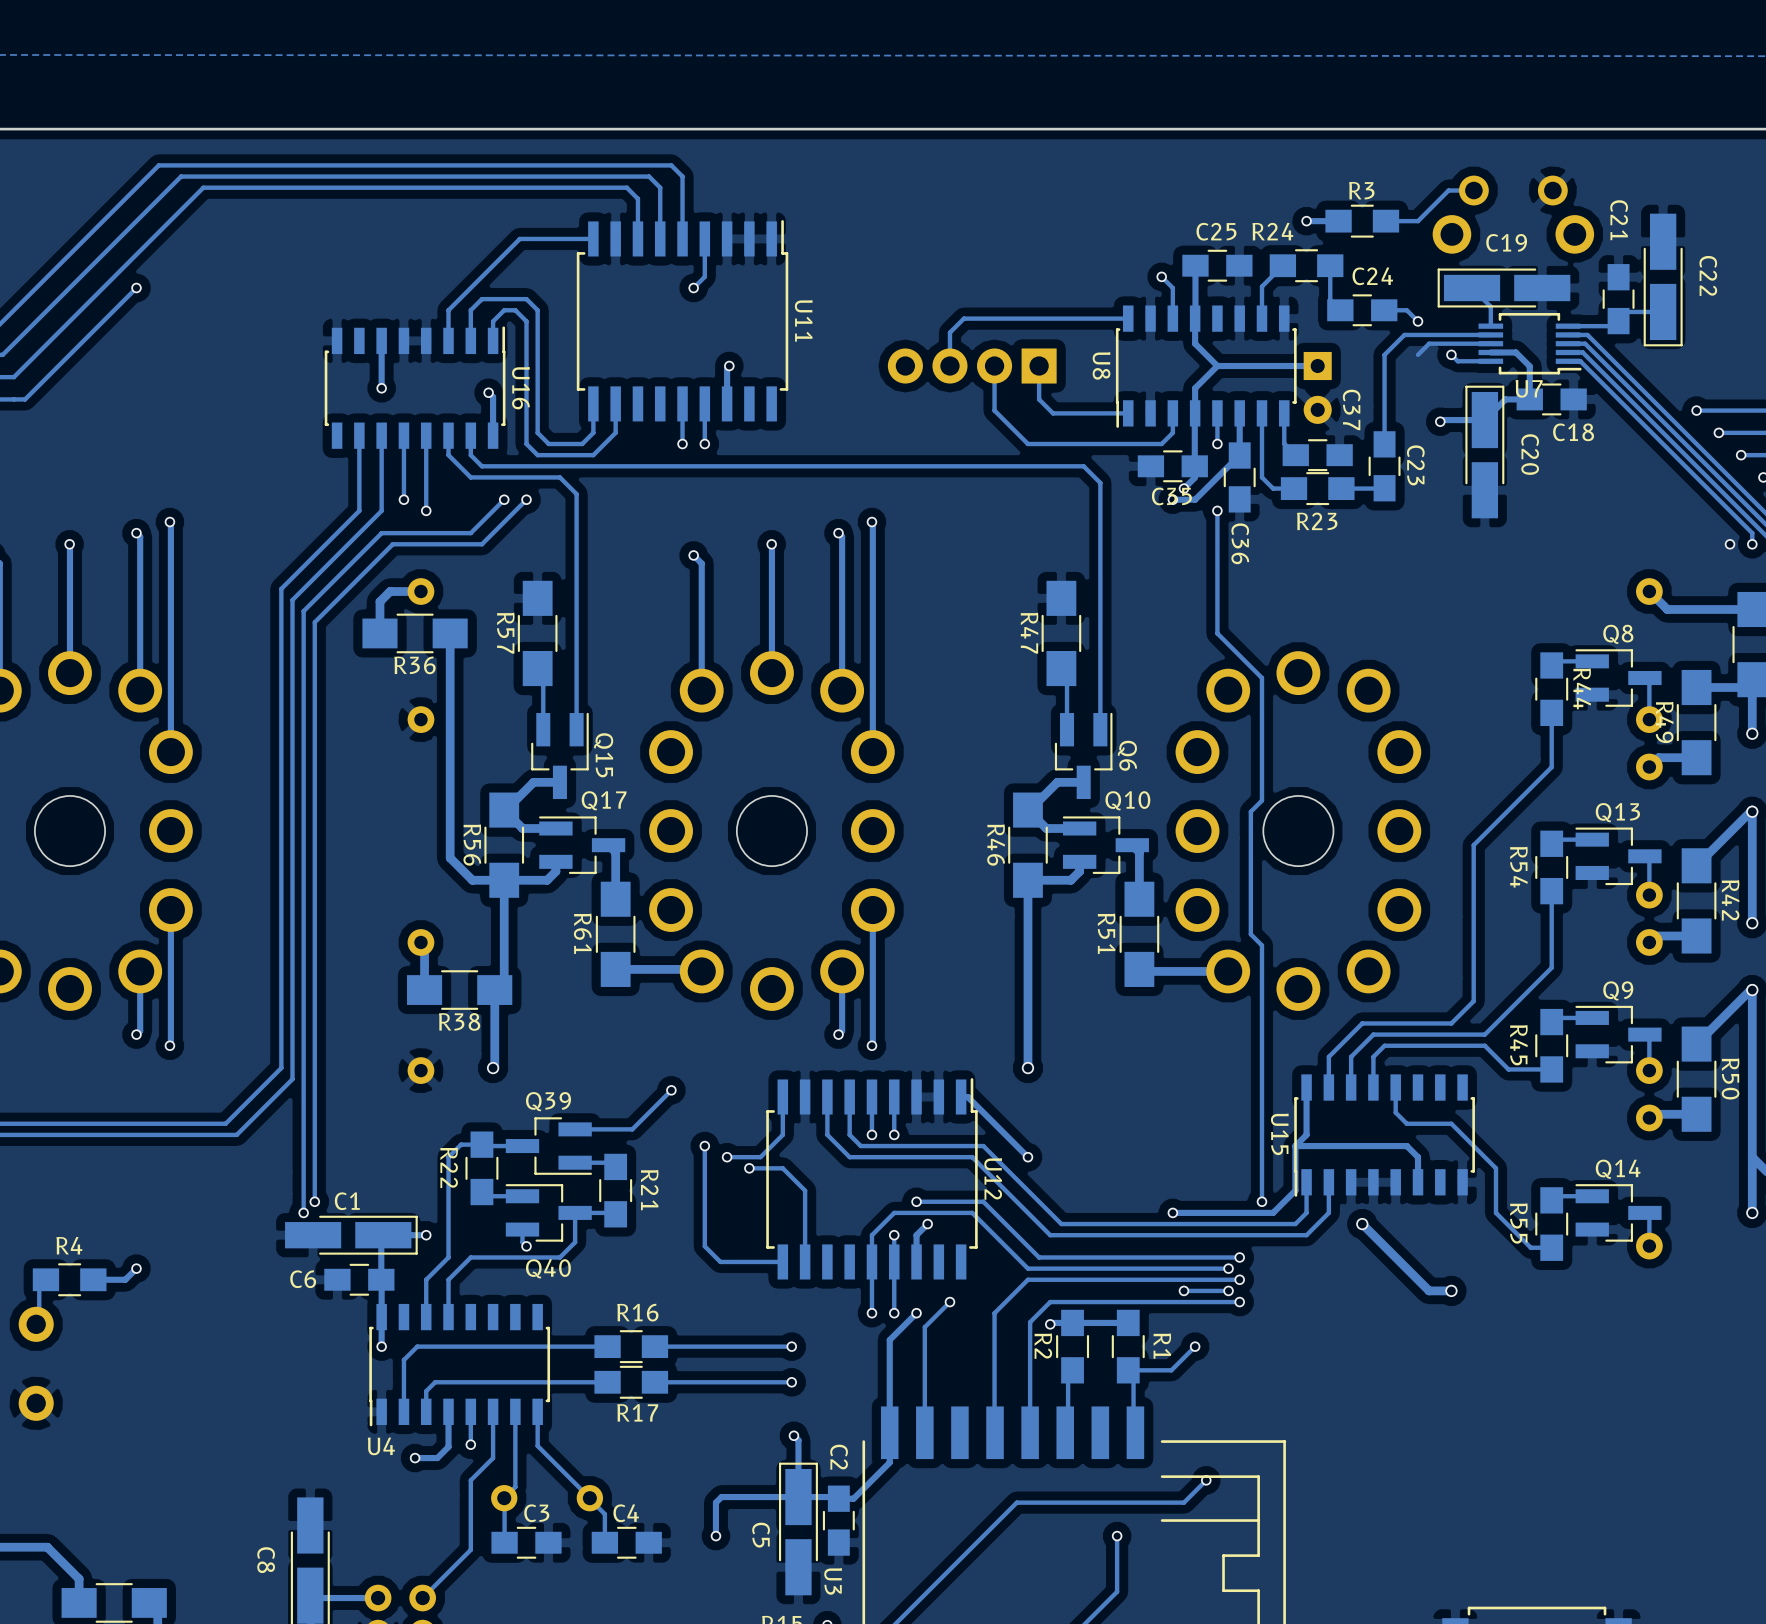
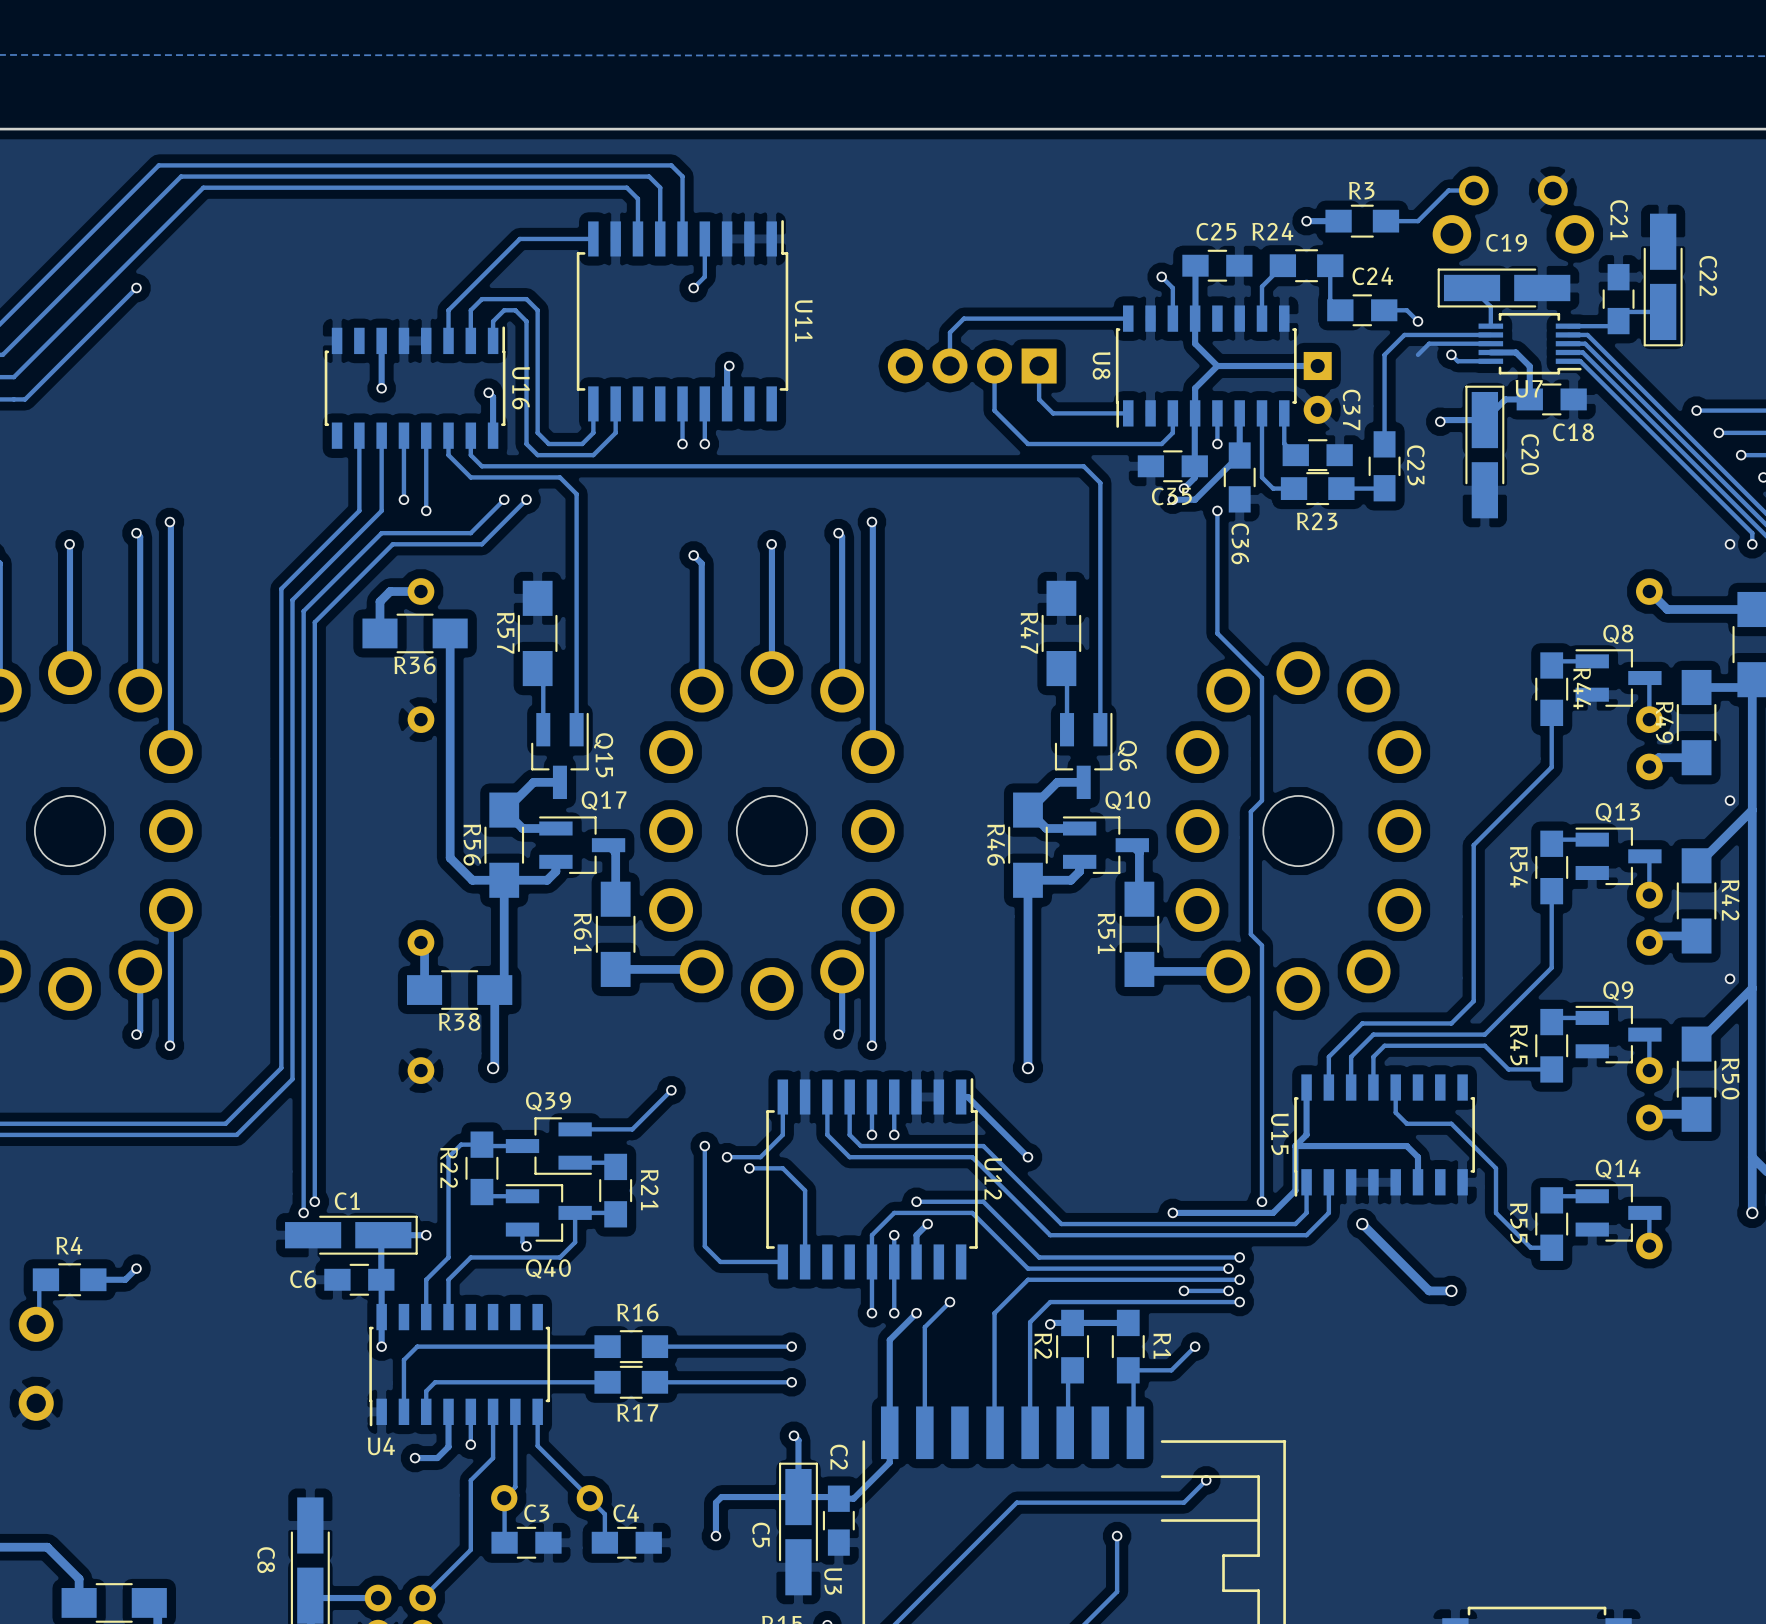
track: none -> (1752, 733) (1752, 810)
via: (1752, 733) -> none
via: none -> (1730, 800)
via: (1752, 811) -> none
track: none -> (1752, 923) (1752, 988)
via: (1752, 923) -> none
via: none -> (1730, 978)
via: (1752, 990) -> none

